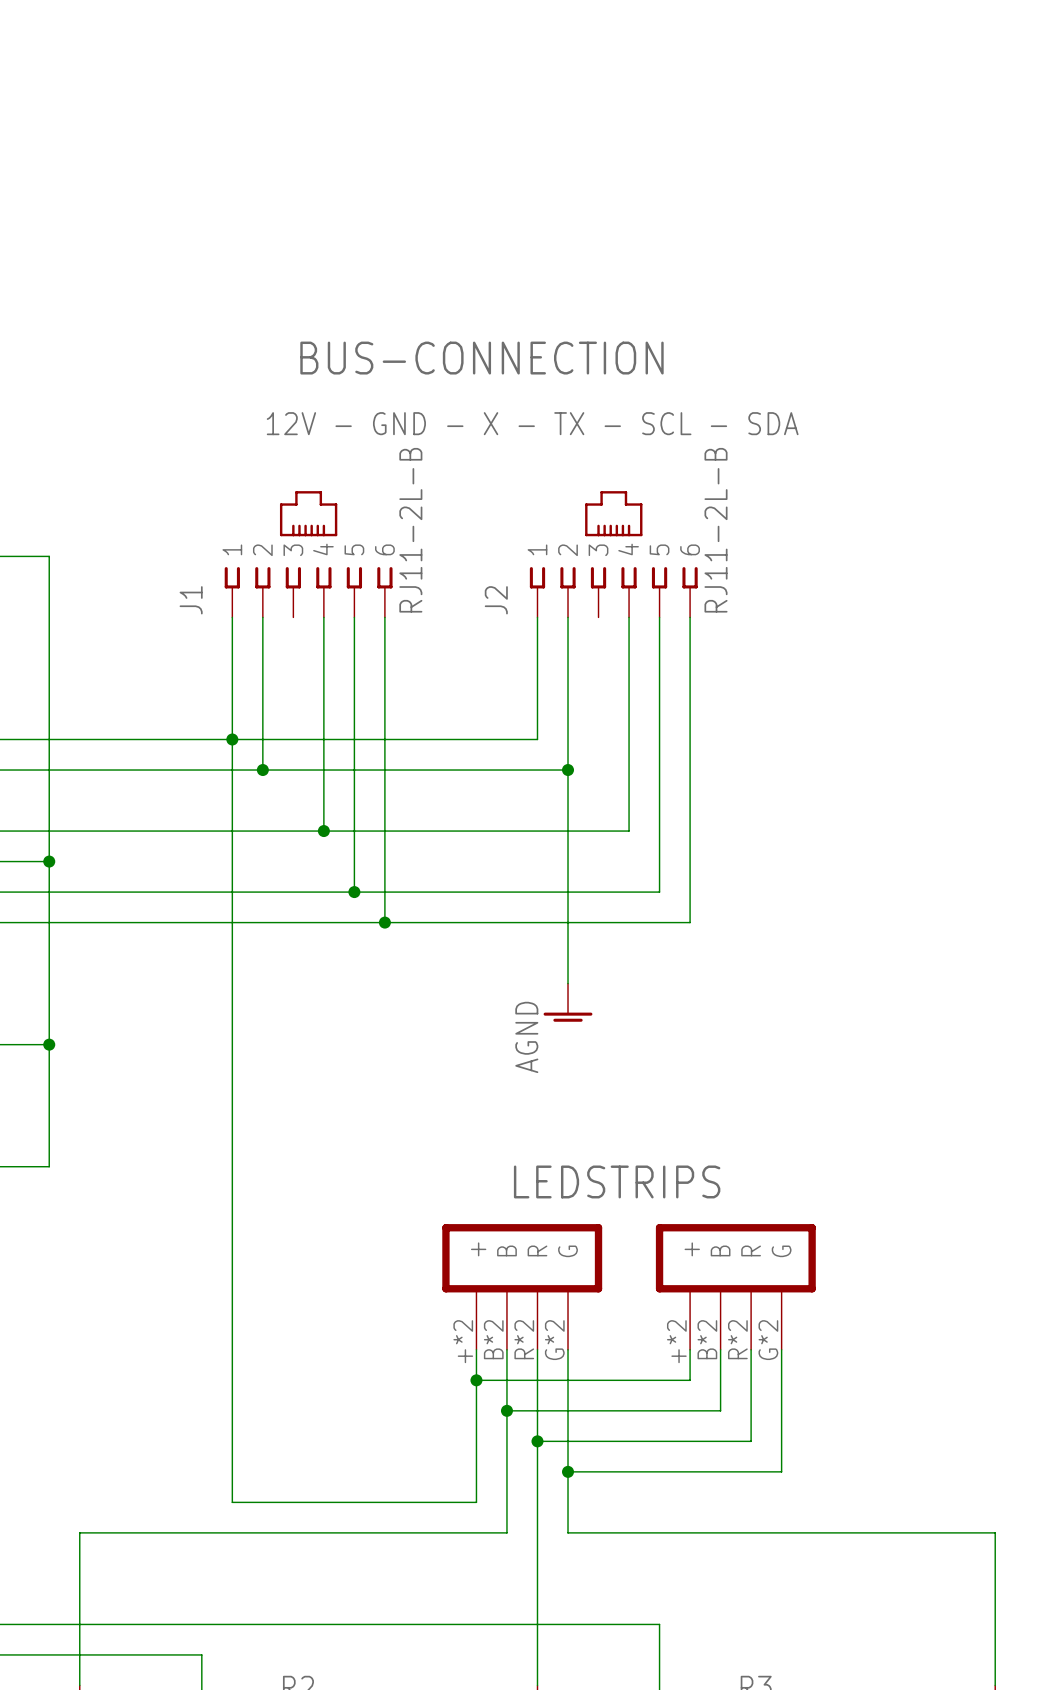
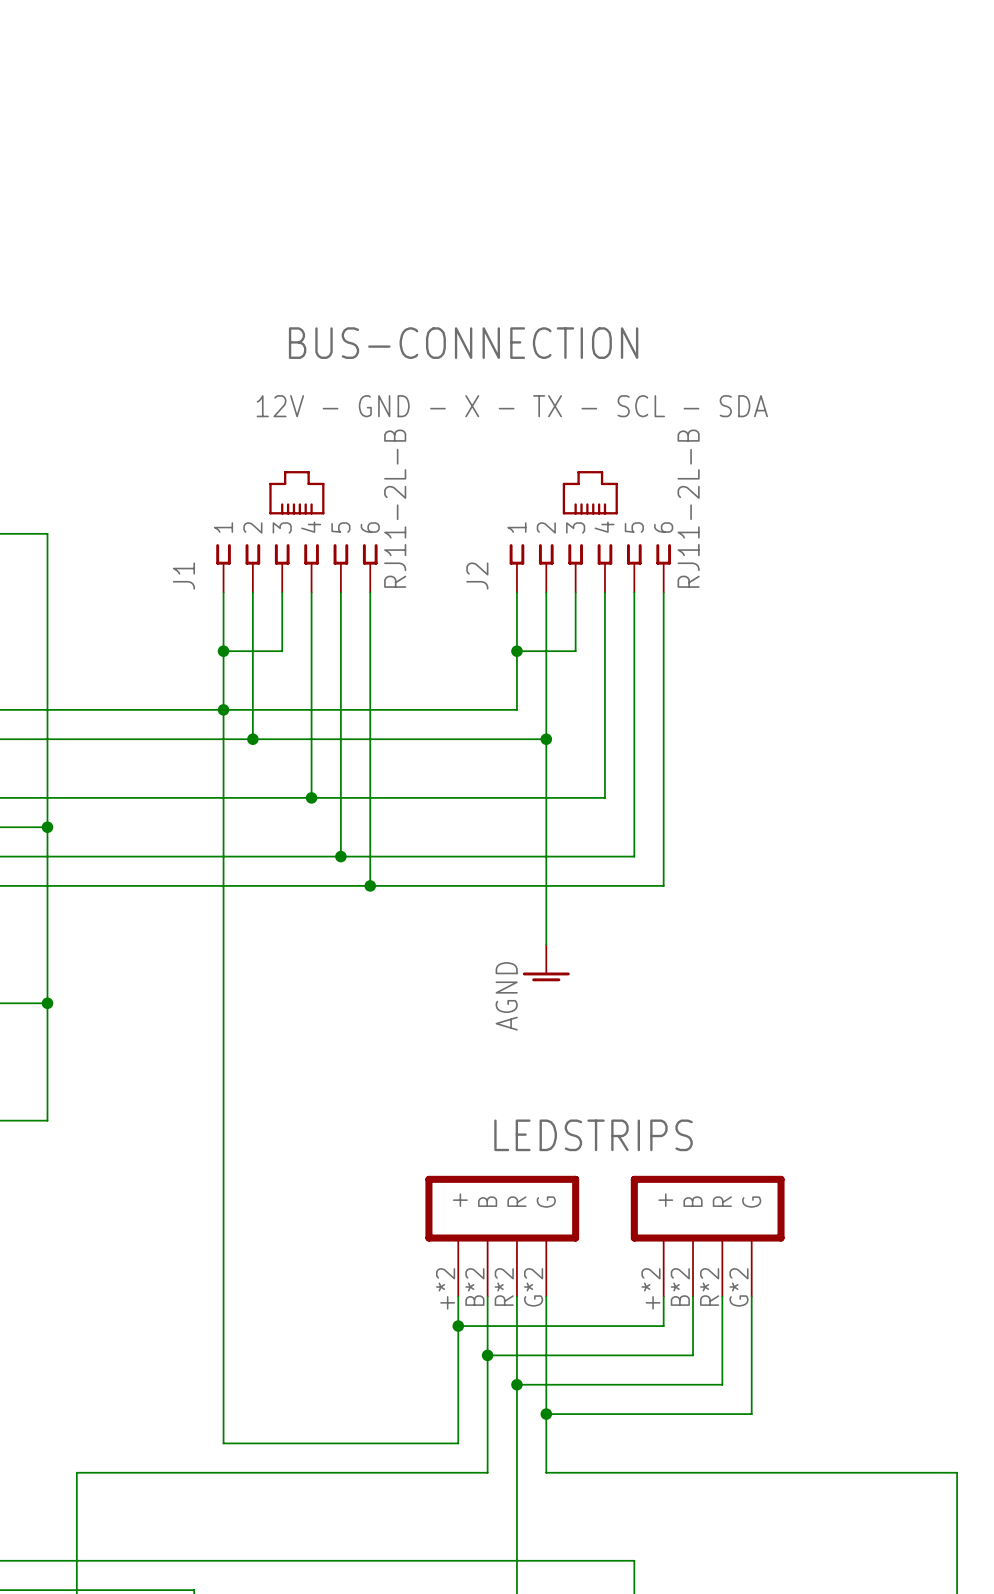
wire: none -> (282, 592) (282, 651) (223, 651)
wire: none -> (575, 592) (575, 651) (516, 651)
junction: none -> (223, 651)
junction: none -> (516, 651)

